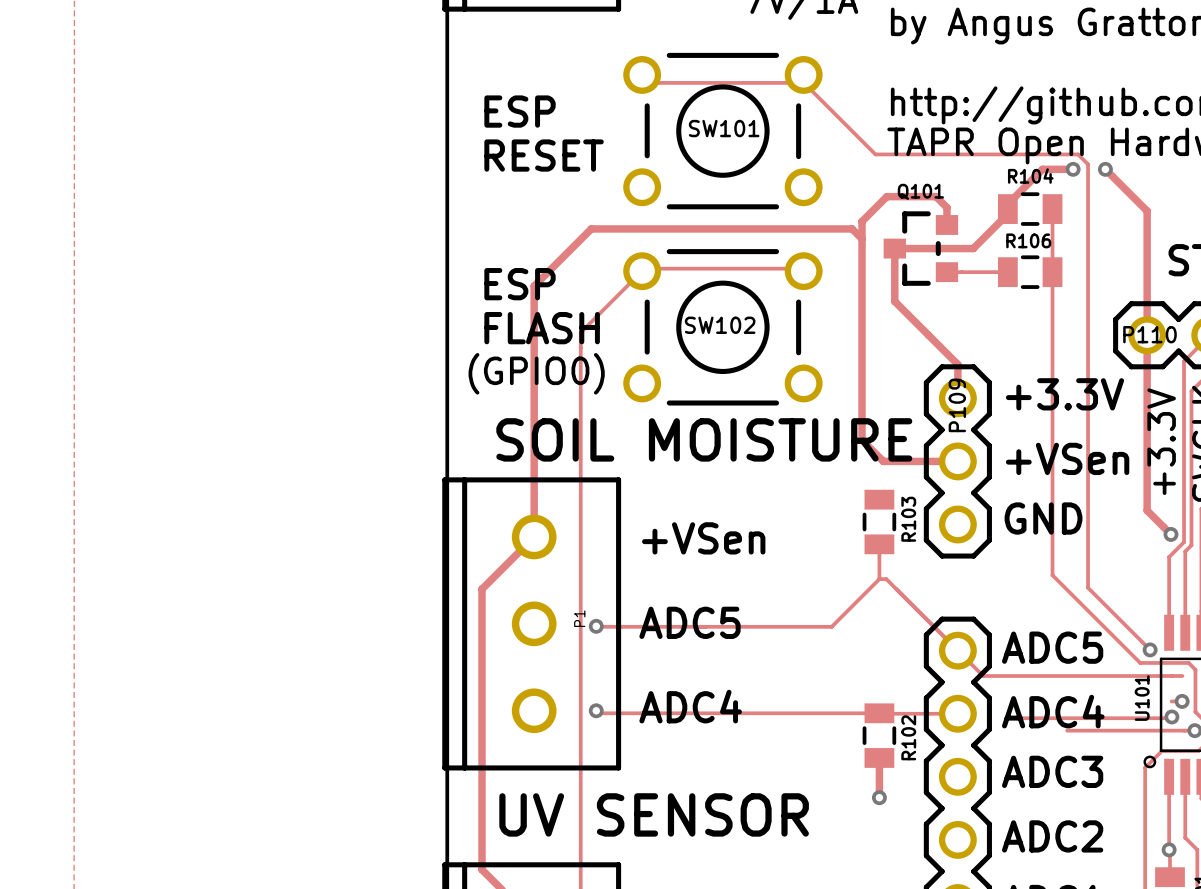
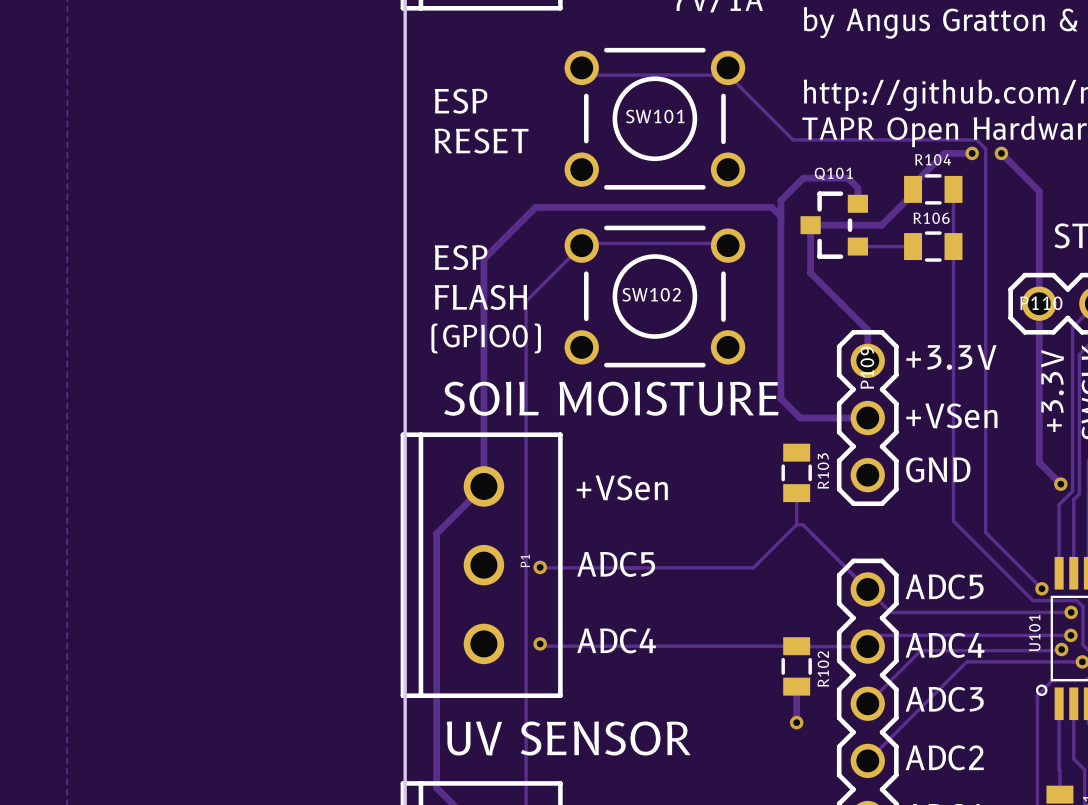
via: none -> (1071, 612)
track: none -> (877, 635) (1061, 635)
track: none -> (920, 650) (867, 703)
track: none -> (966, 661) (867, 760)
via: (1169, 849) -> none

